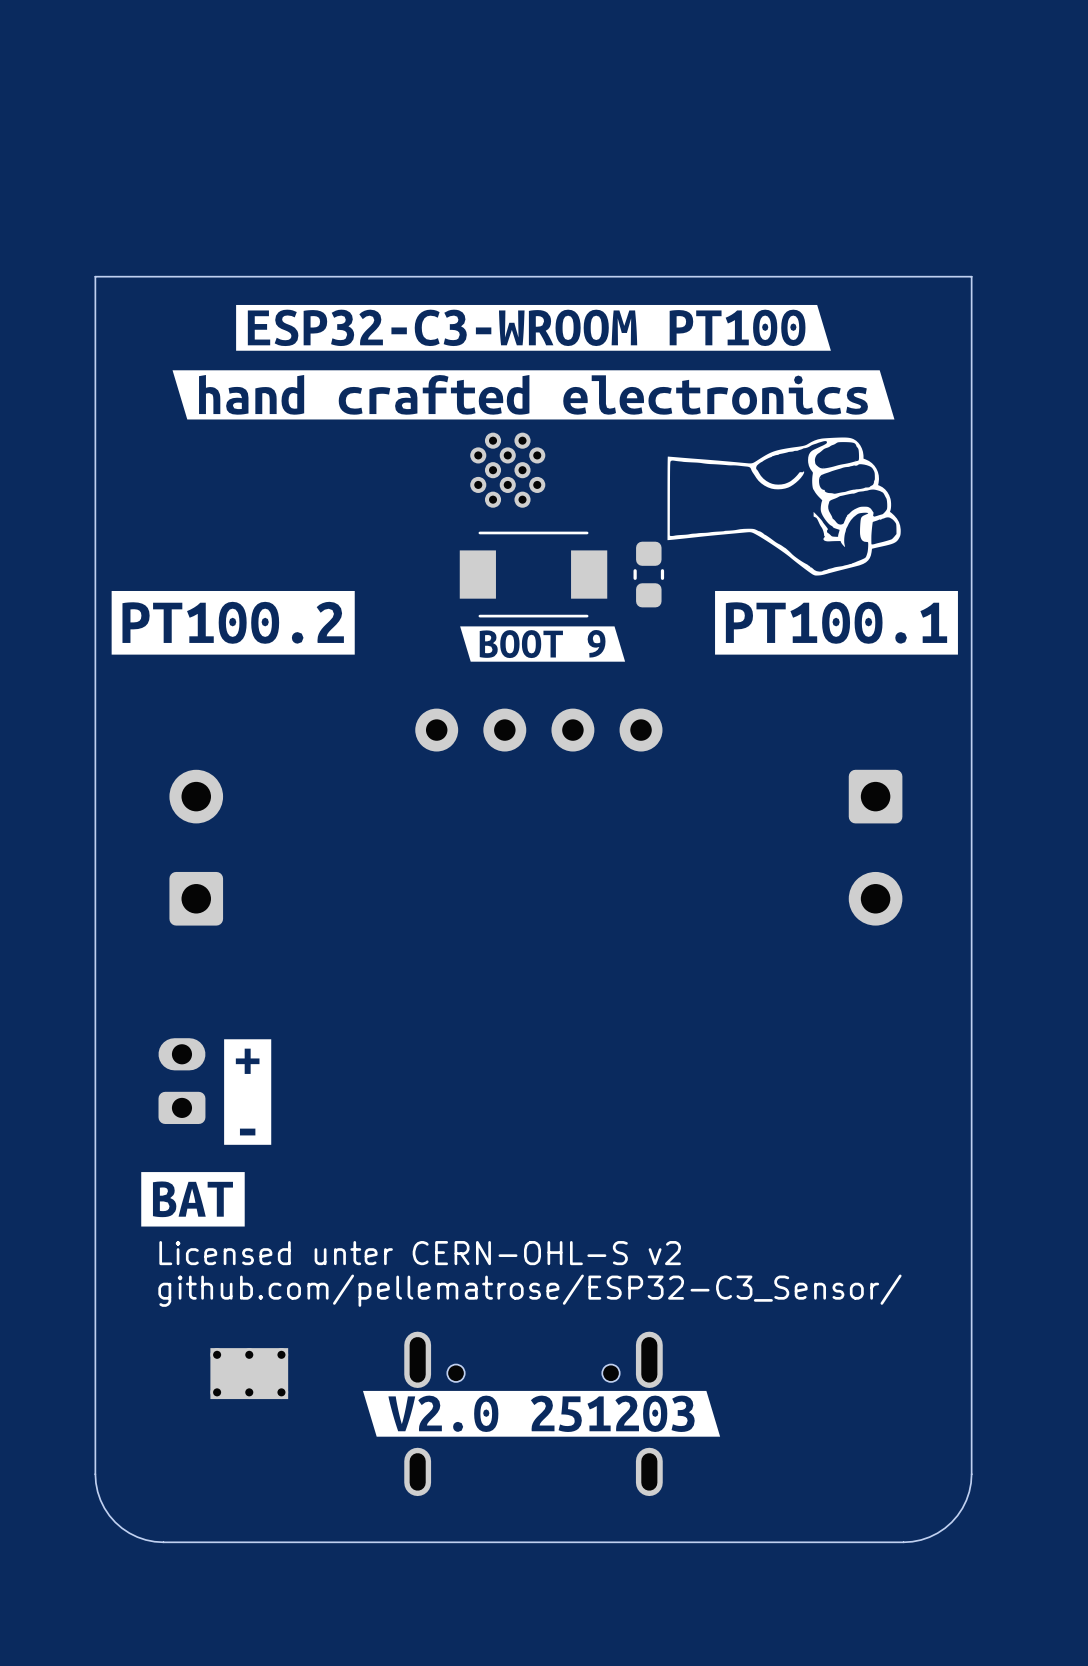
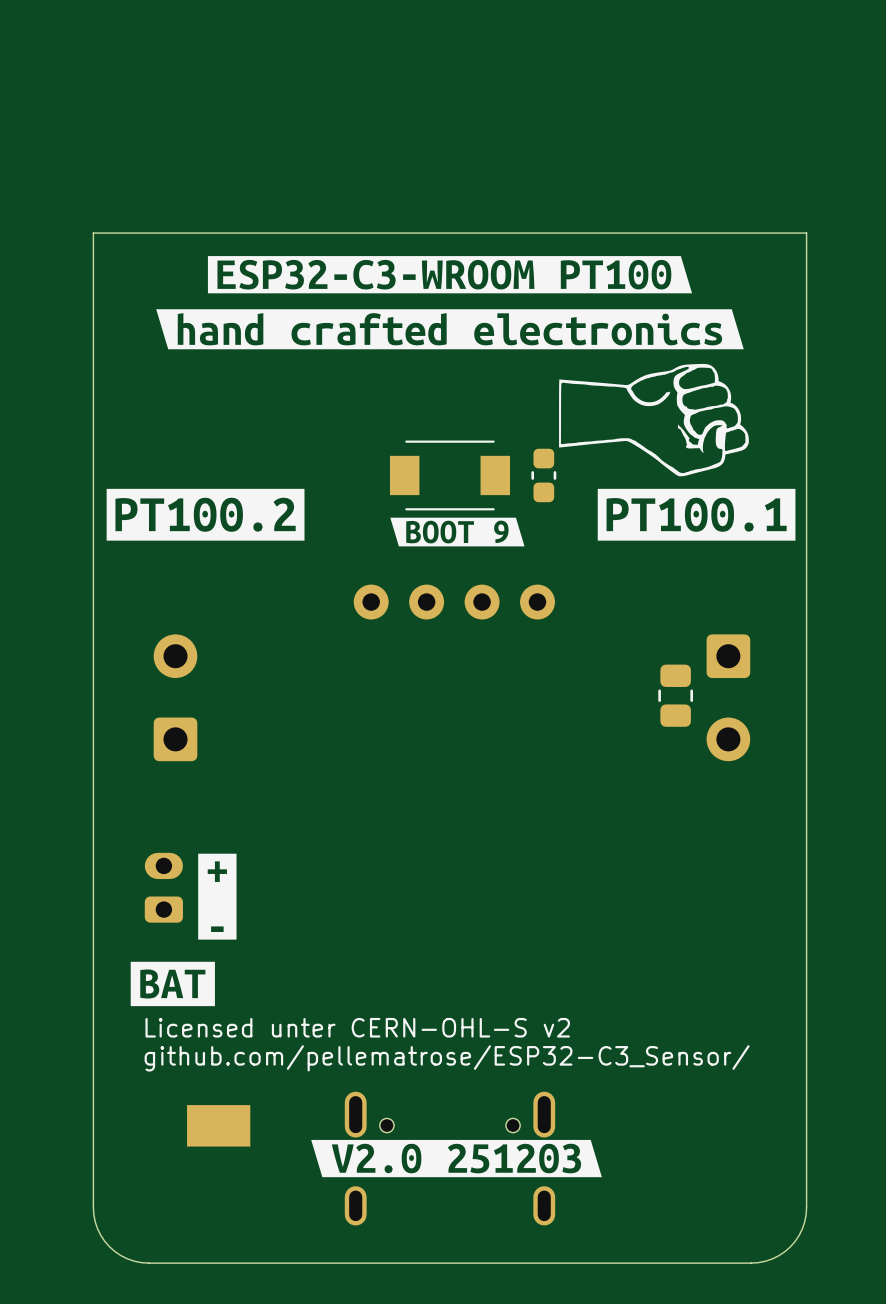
part: (507, 470) -> none
part: none -> (675, 695)
part footprint: [210, 1348, 289, 1400] -> [187, 1105, 251, 1147]

